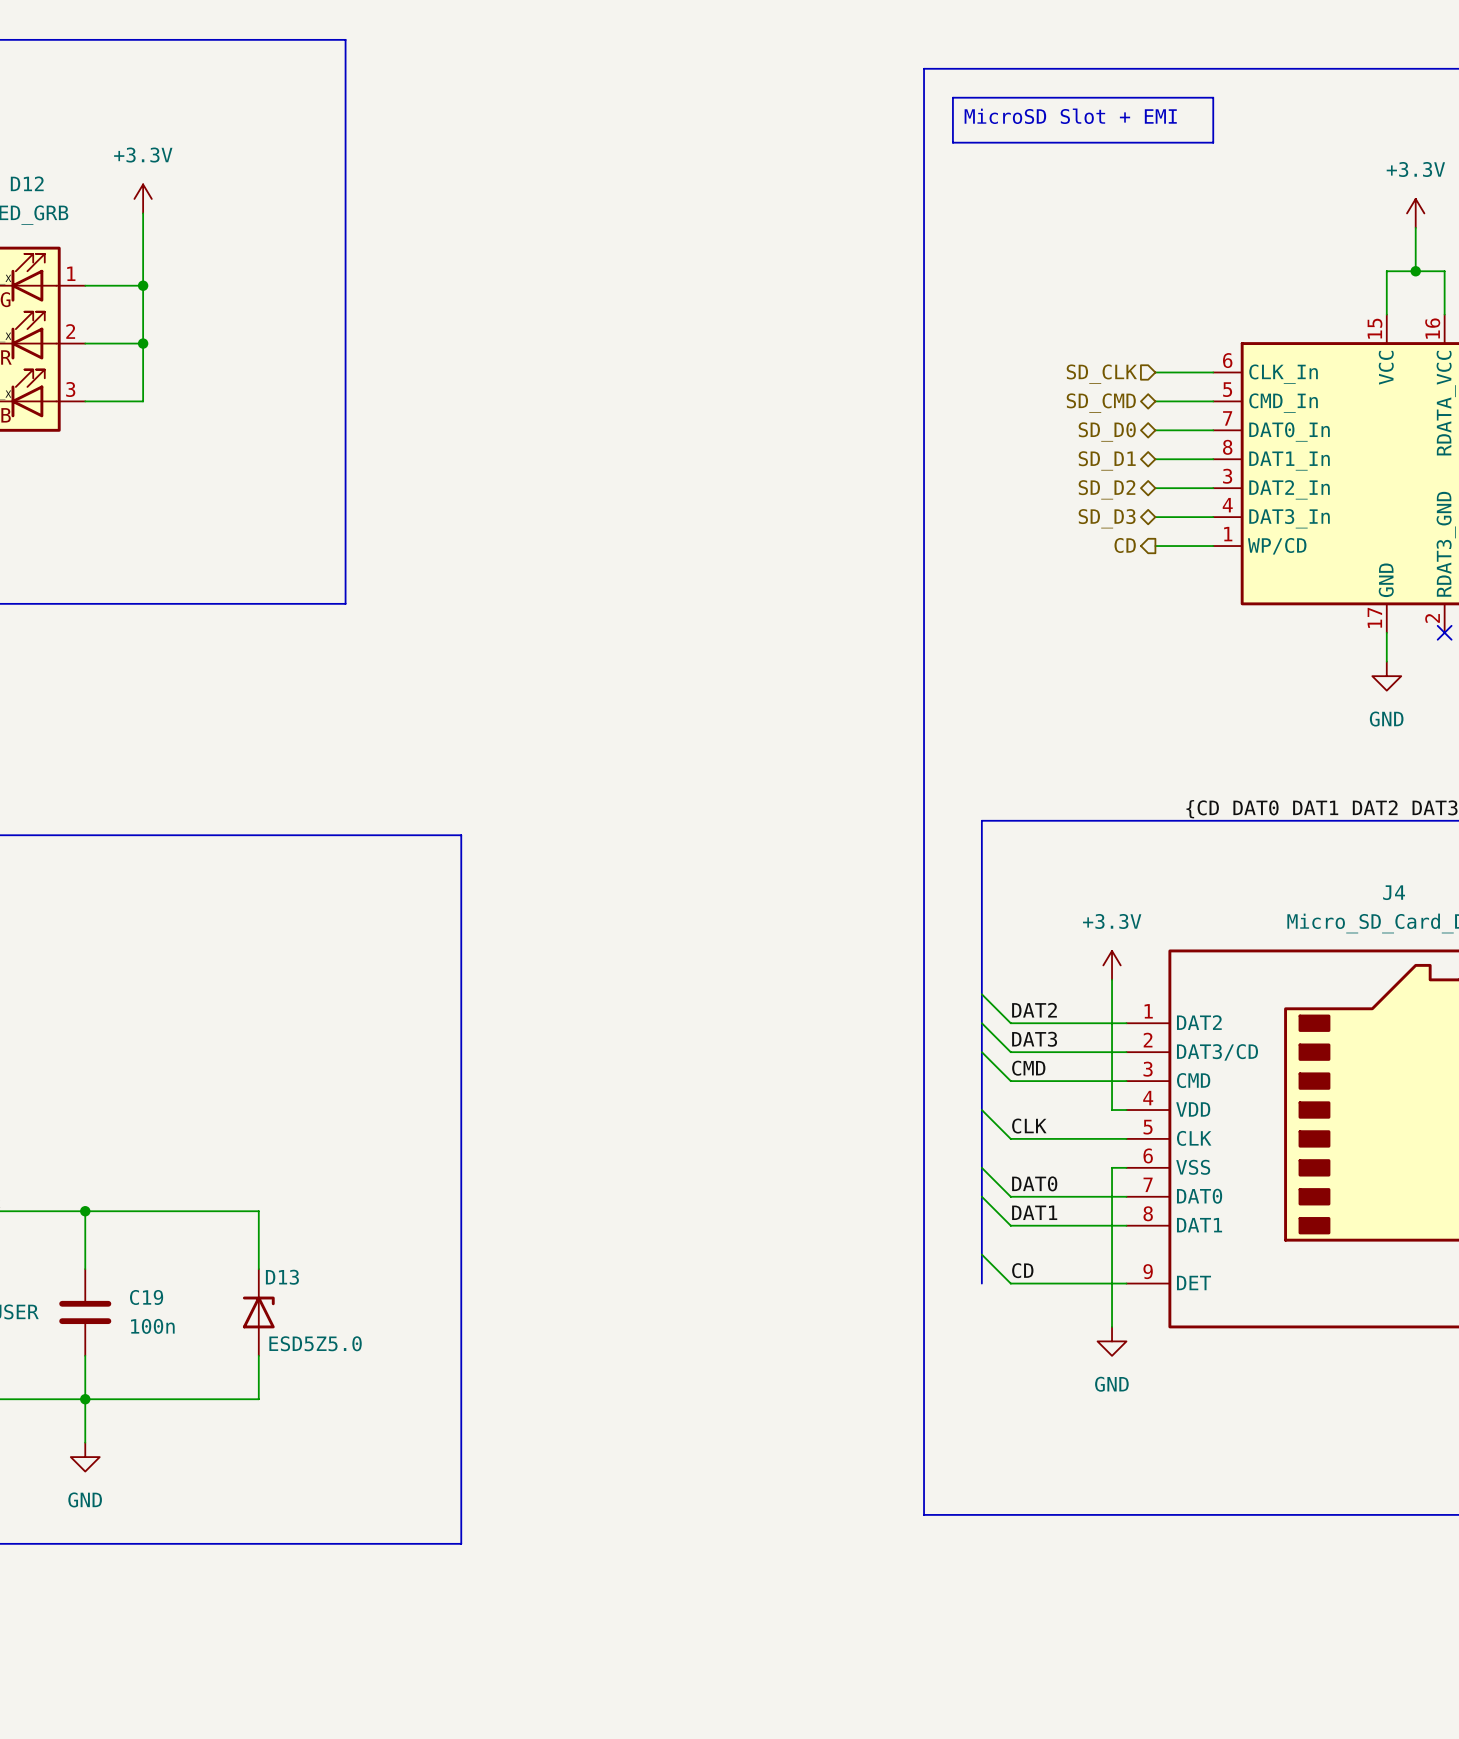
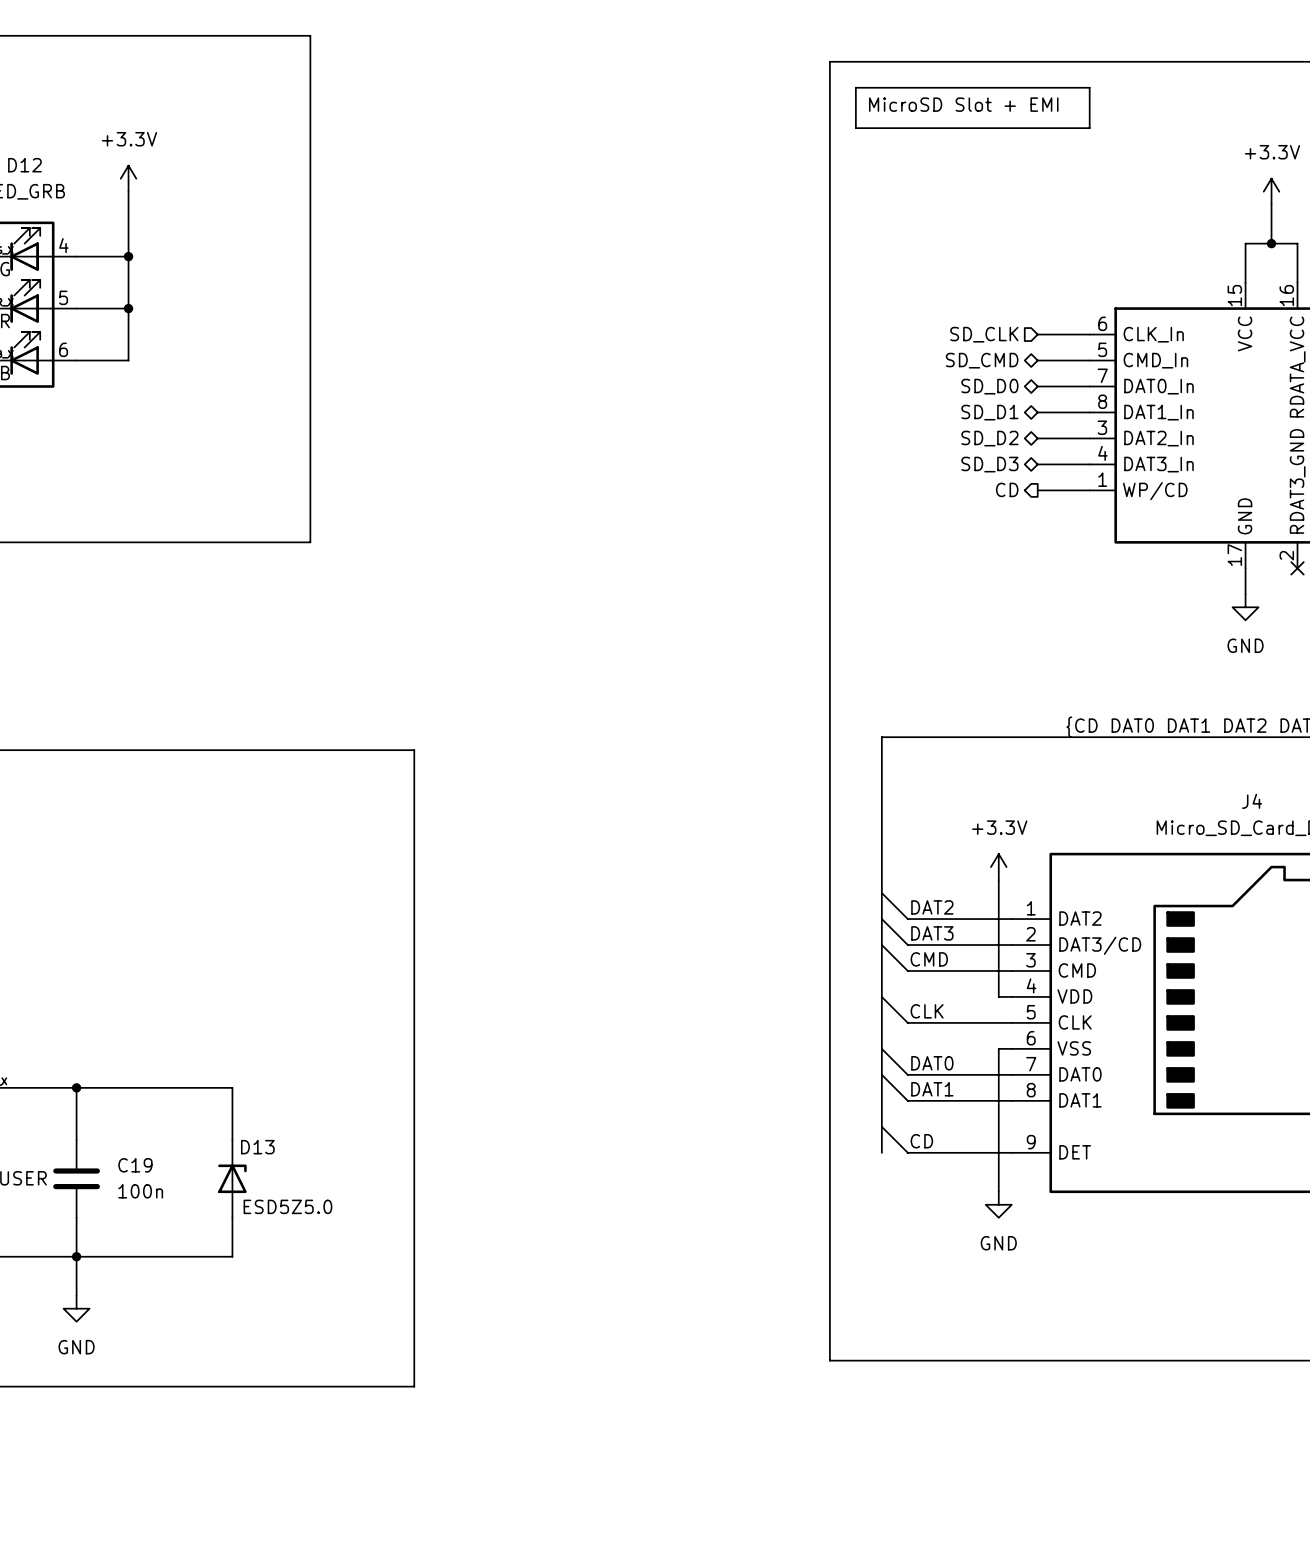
D12 pin number: 1 (71, 273) -> 4 (63, 245)
D12 pin number: 2 (70, 331) -> 5 (63, 297)
D12 pin number: 3 (70, 389) -> 6 (63, 349)

